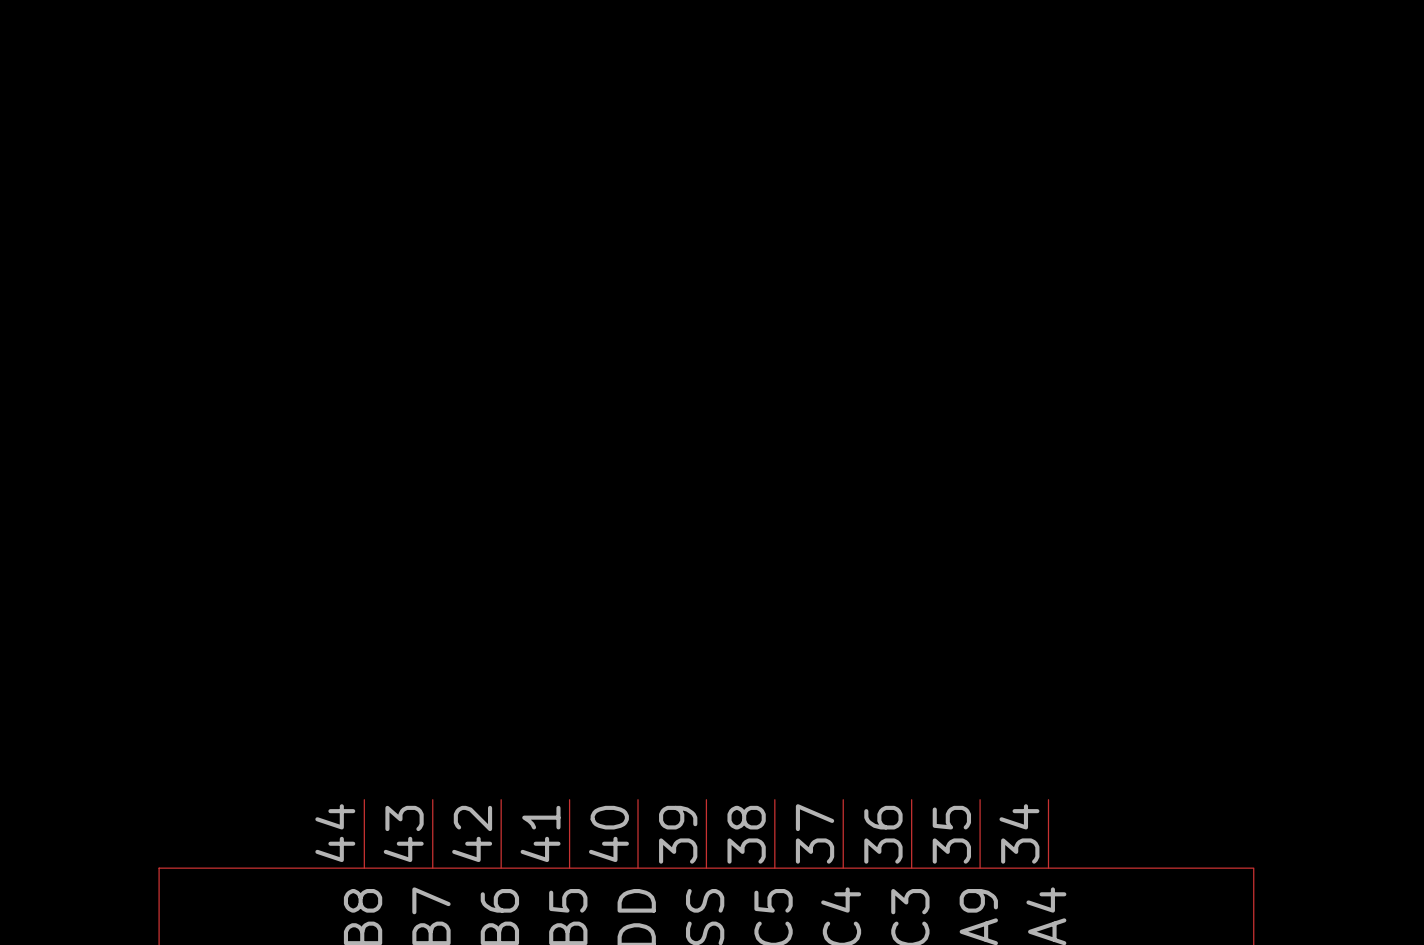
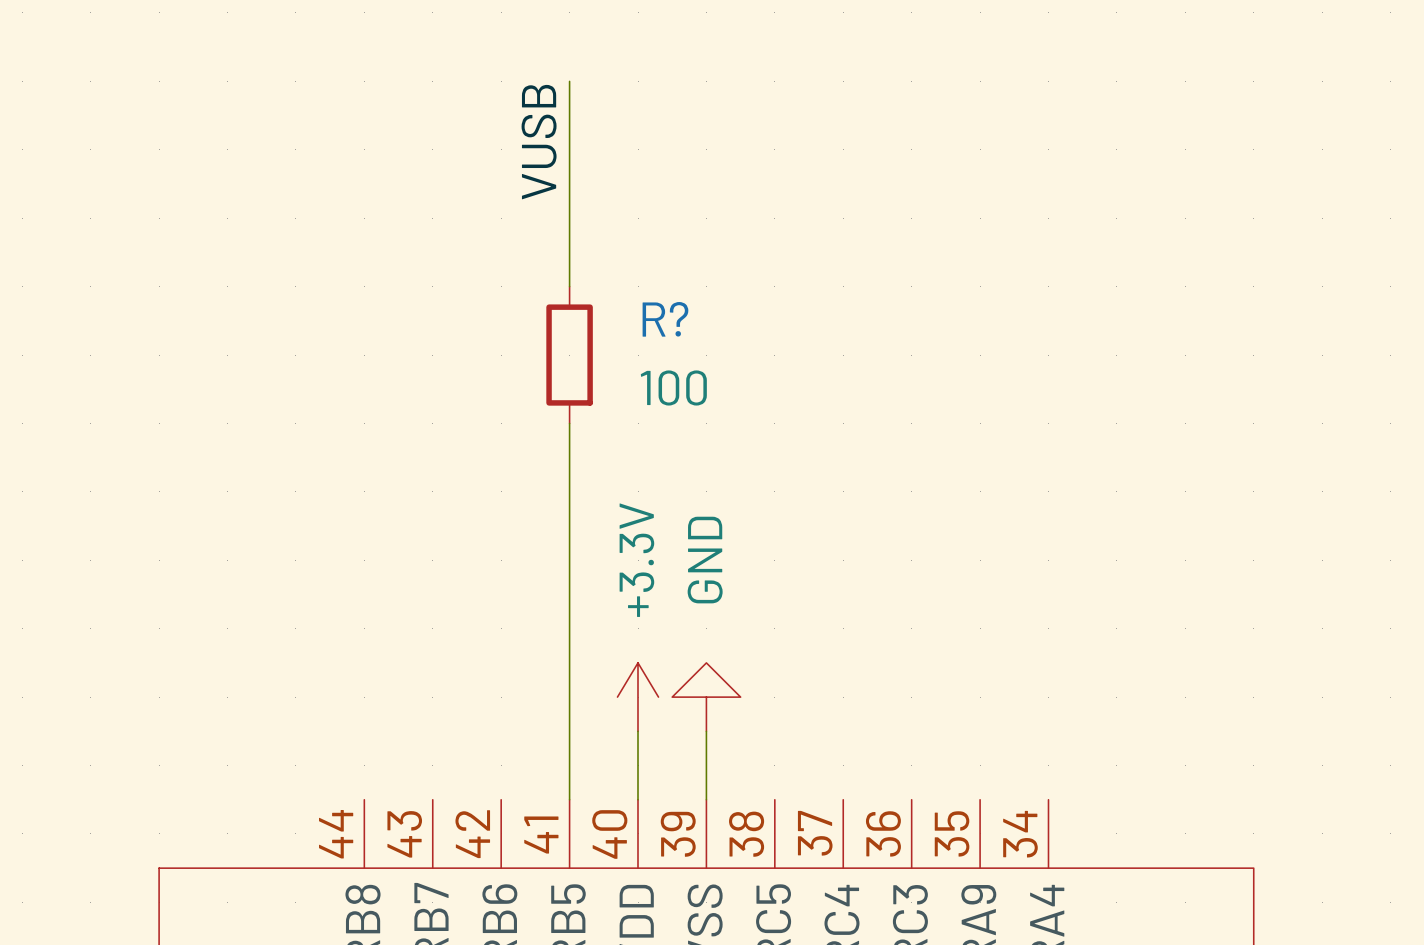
wire: none -> (569, 81) (569, 286)
label: none -> VUSB (539, 142)
R?: none -> 100 (569, 355)
wire: none -> (569, 423) (569, 799)
power symbol: none -> +3.3V (638, 697)
power symbol: none -> GND (706, 697)
wire: none -> (638, 731) (638, 799)
wire: none -> (706, 731) (706, 799)

